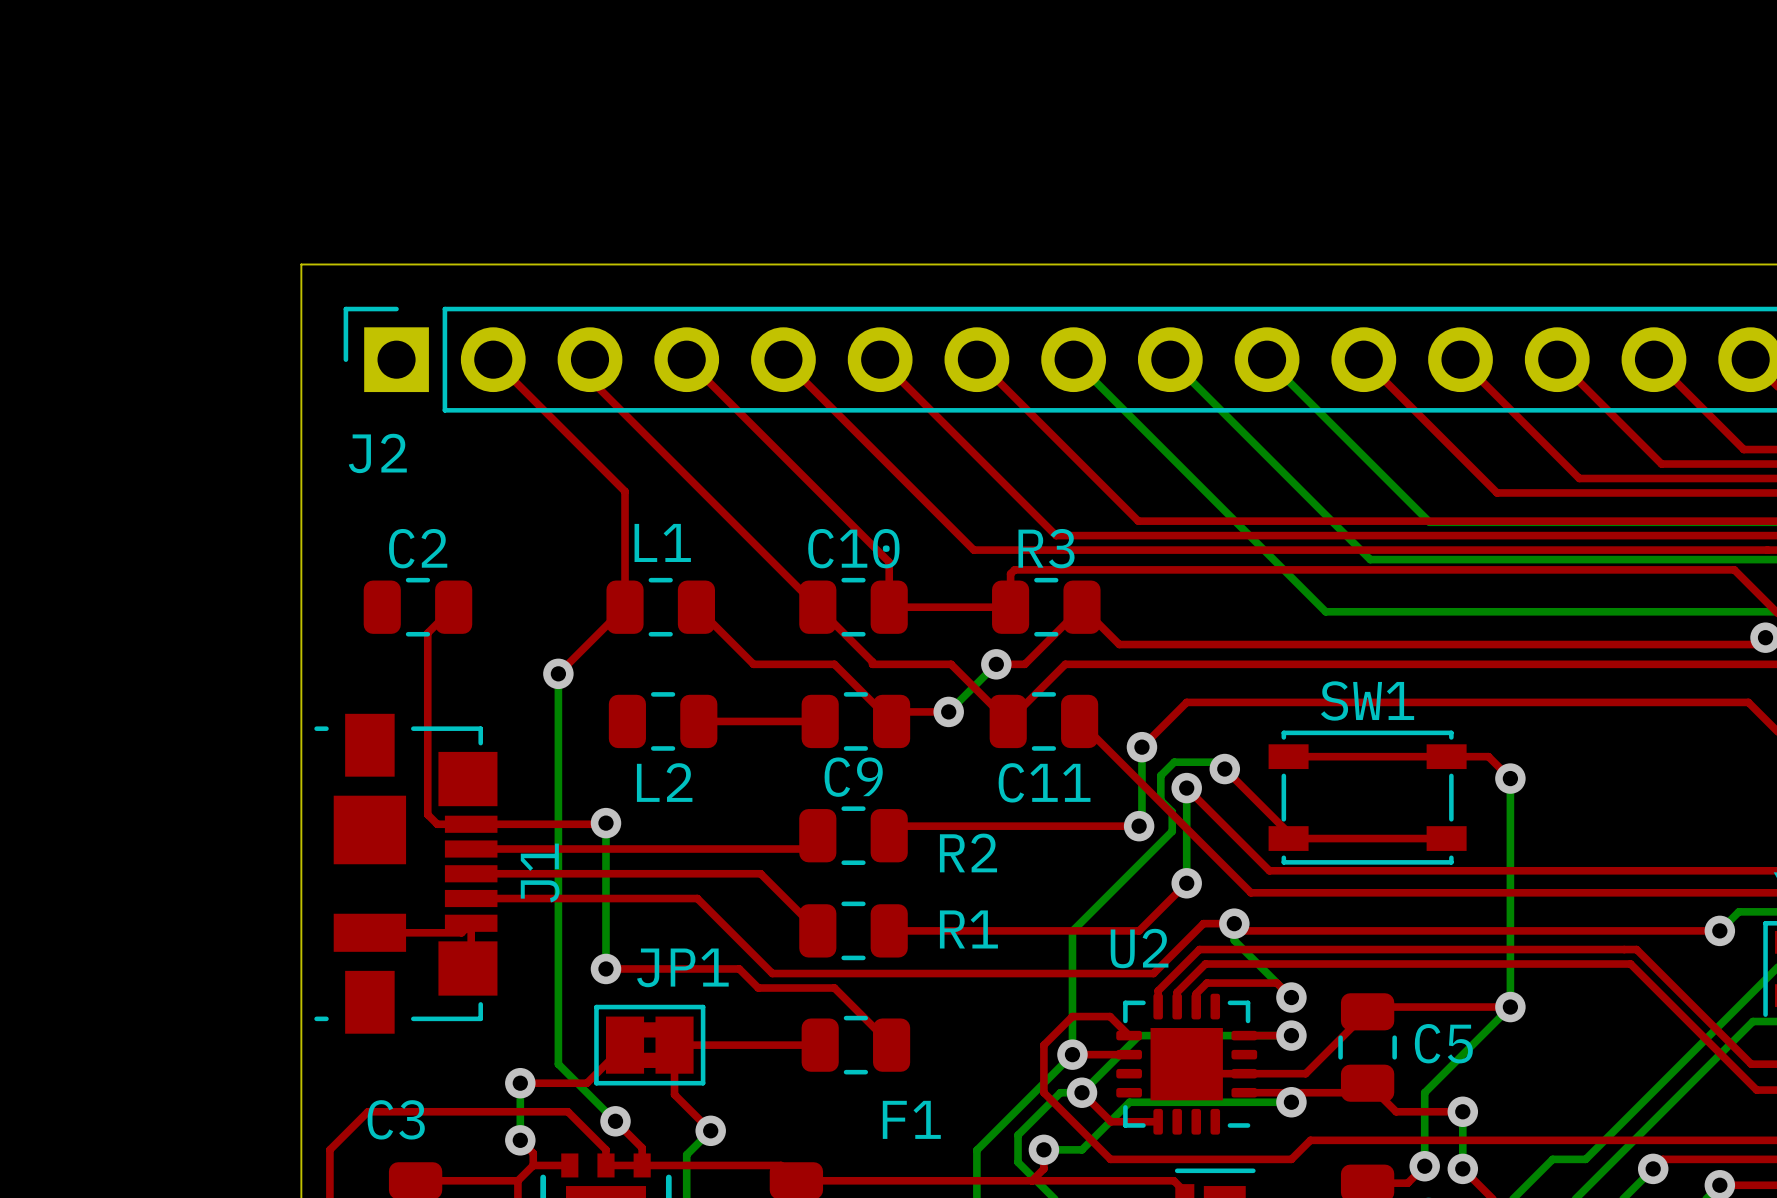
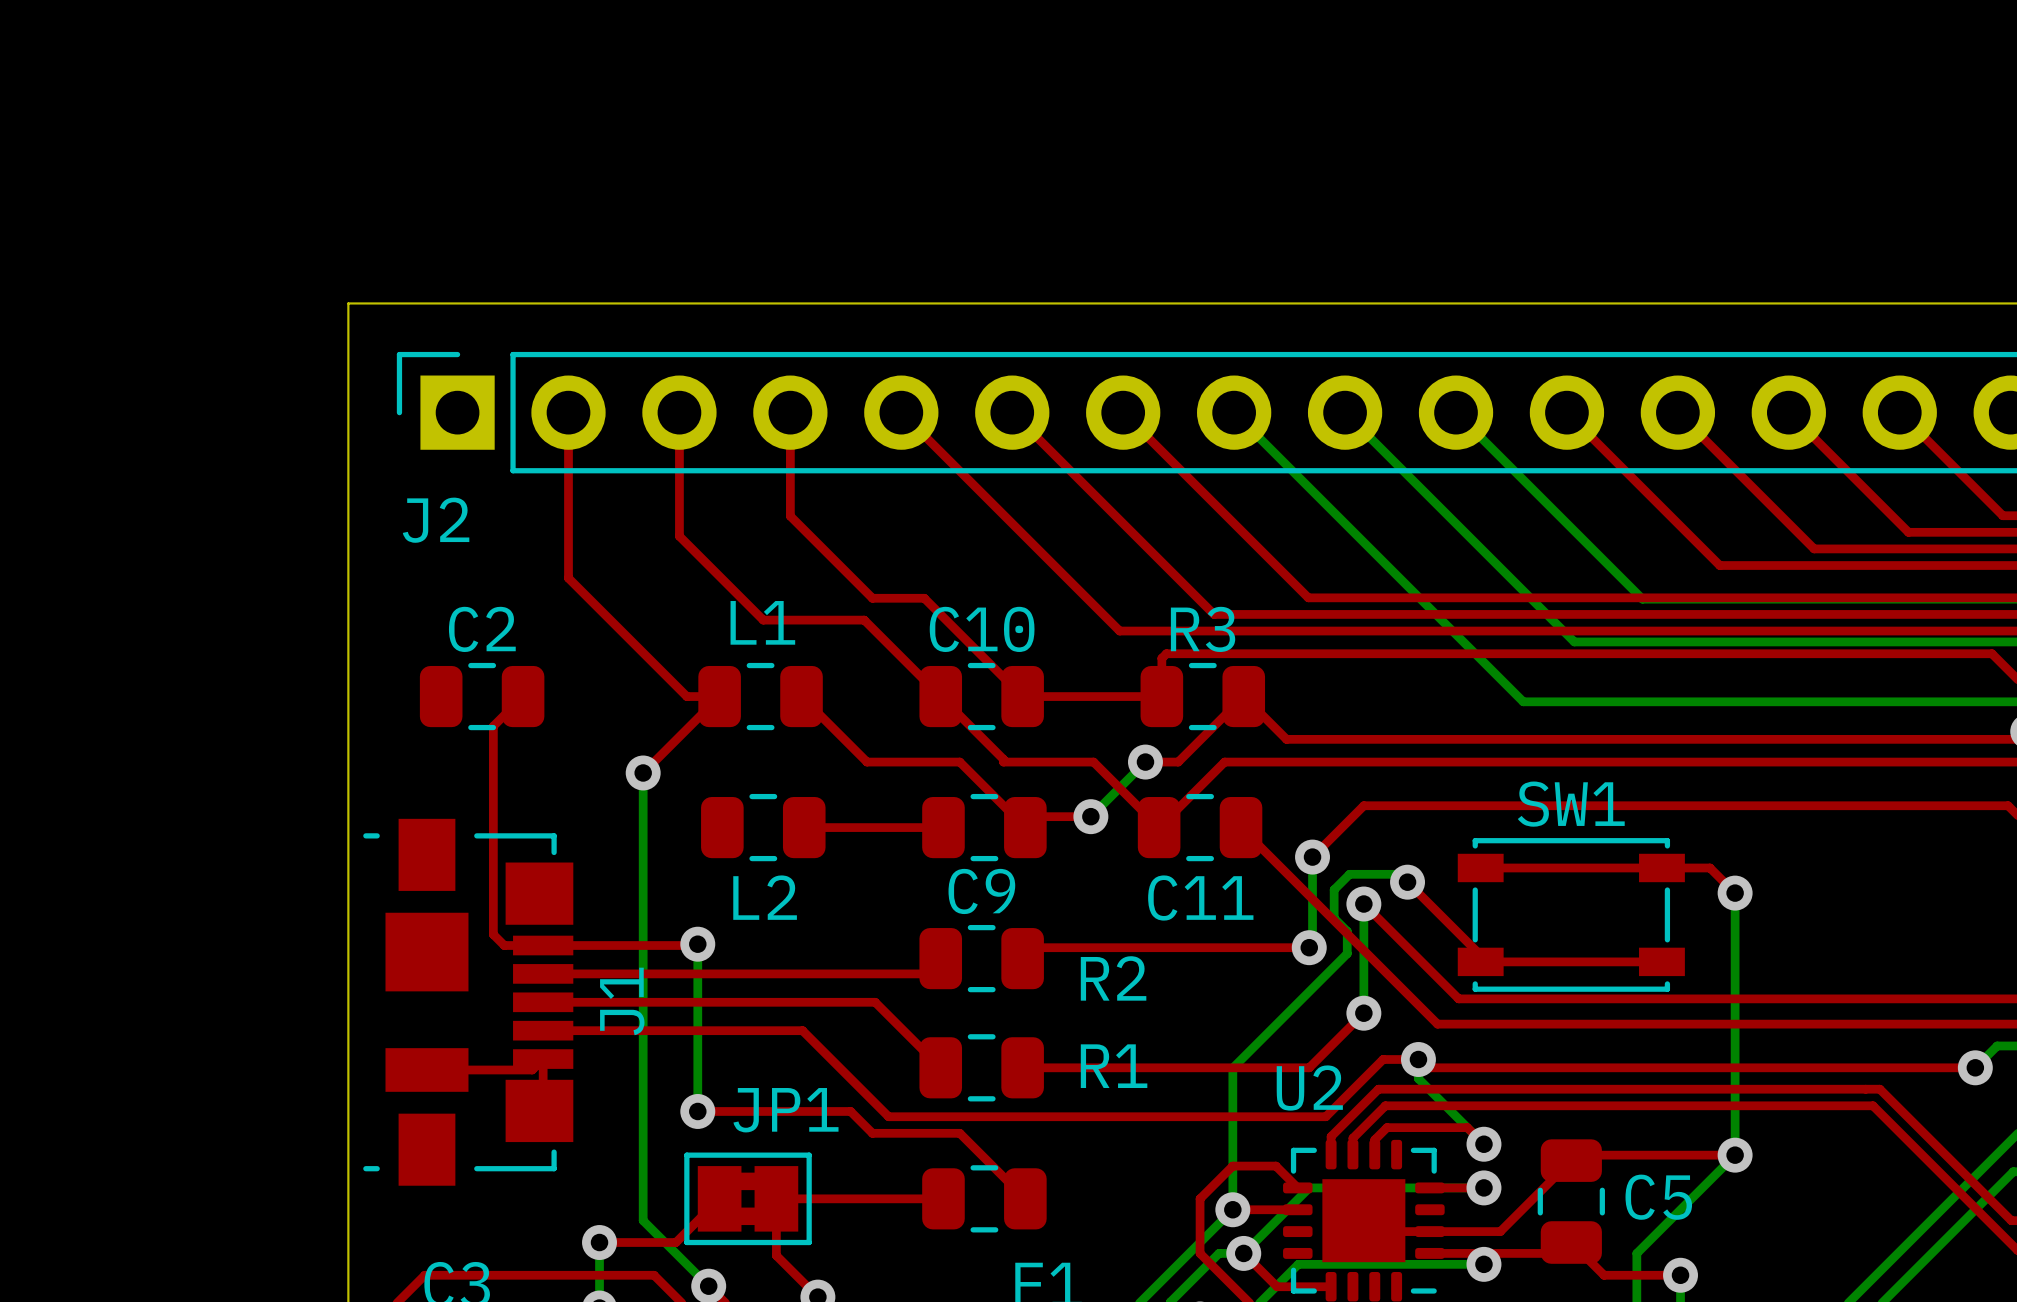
top track: (493, 359) (625, 491) (625, 607) -> (568, 412) (568, 578) (686, 696) (719, 696)
top track: (686, 359) (889, 562) (889, 607) -> (790, 412) (790, 516) (872, 598) (924, 598) (1022, 696)
top track: (589, 379) (751, 540) -> (679, 435) (679, 536) (763, 620) (864, 620)

